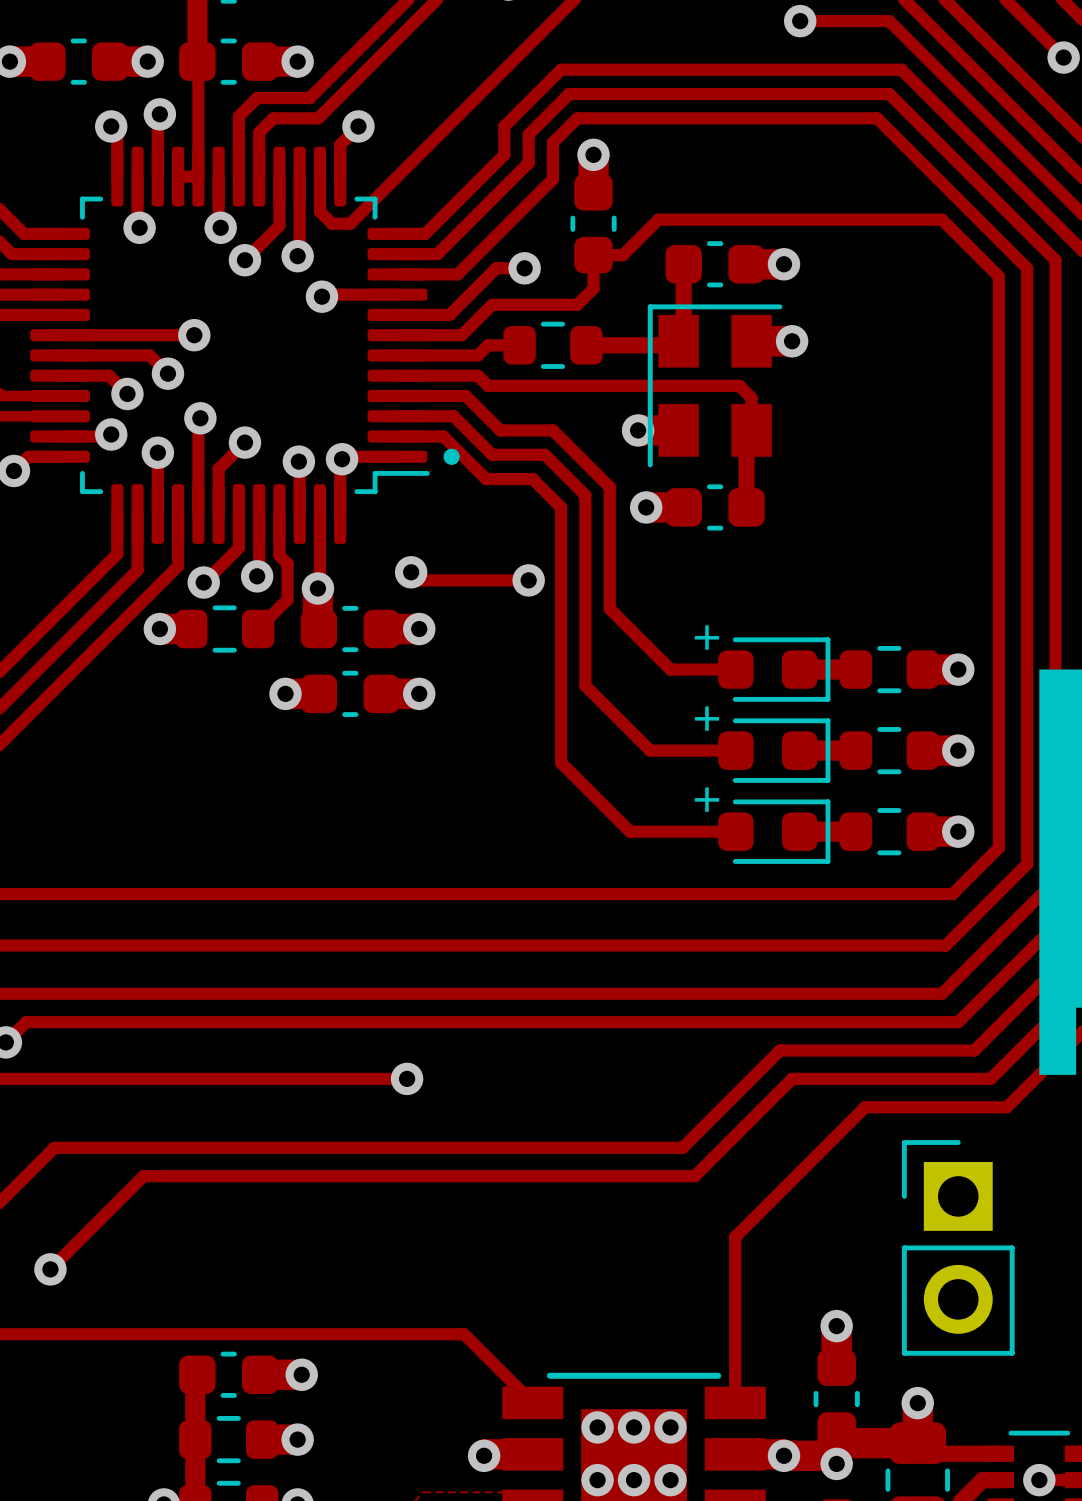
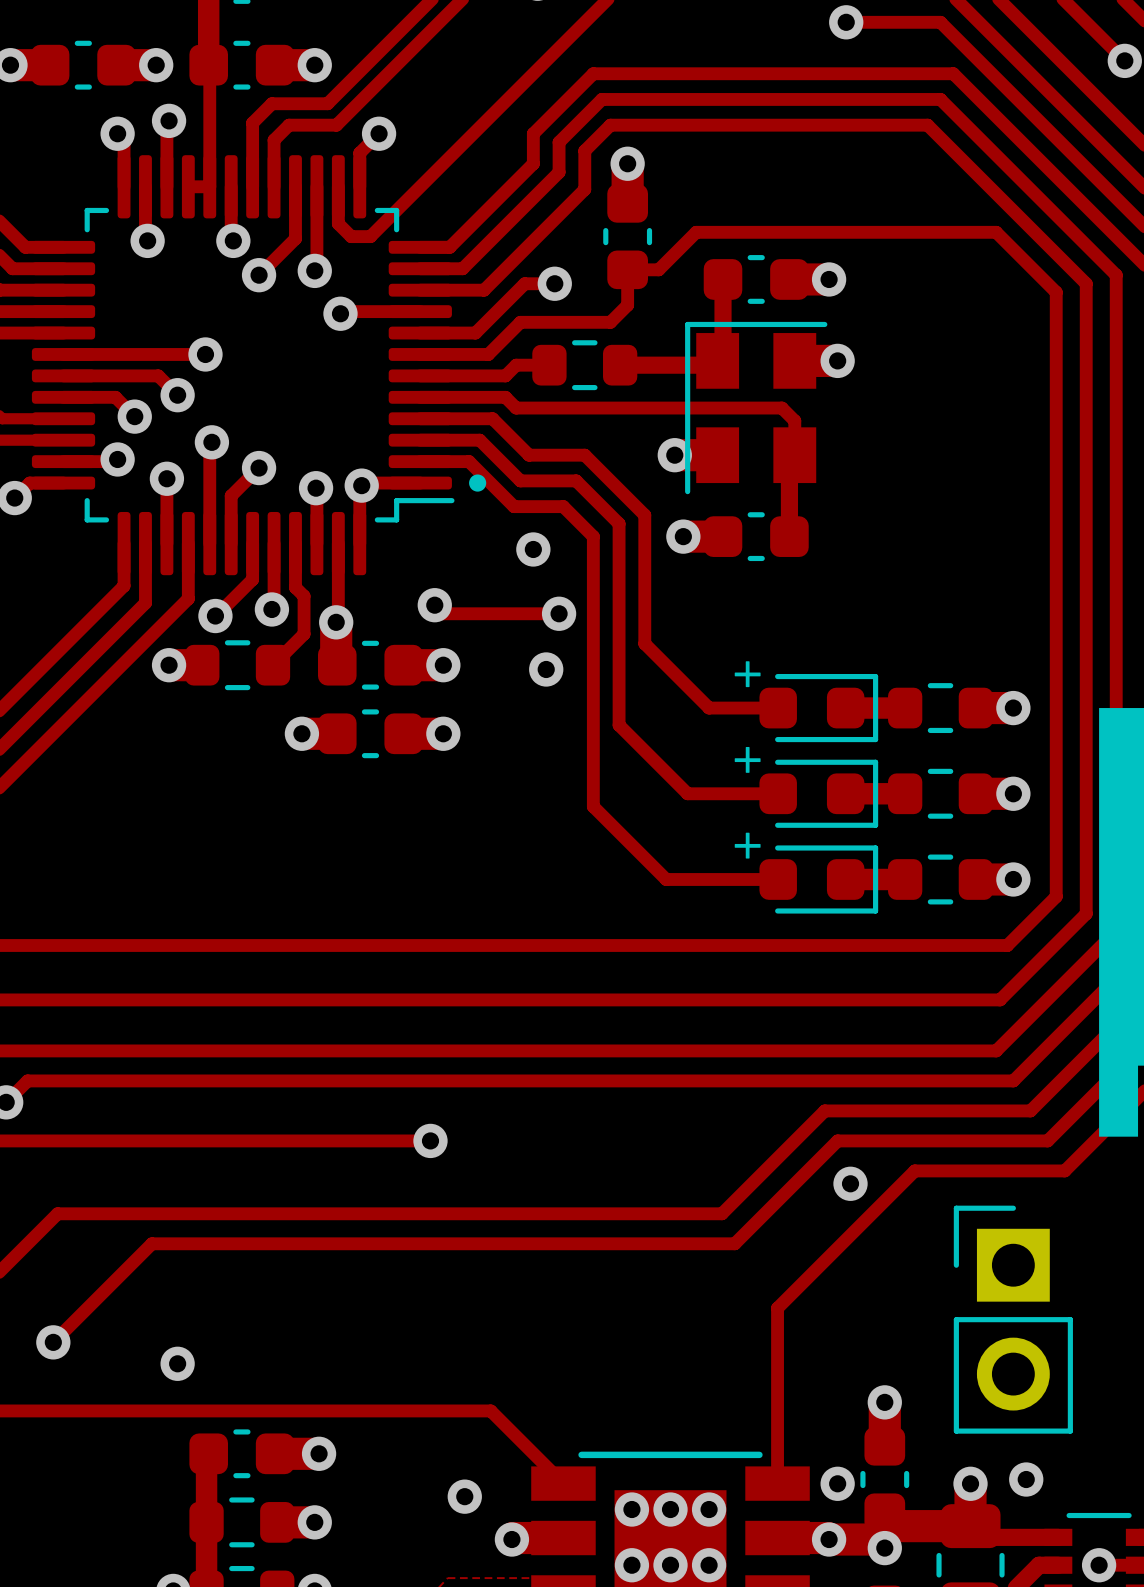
via: none -> (533, 549)
via: none -> (546, 669)
via: none -> (850, 1183)
via: none -> (177, 1363)
via: none -> (1026, 1479)
via: none -> (837, 1483)
via: none -> (464, 1496)

